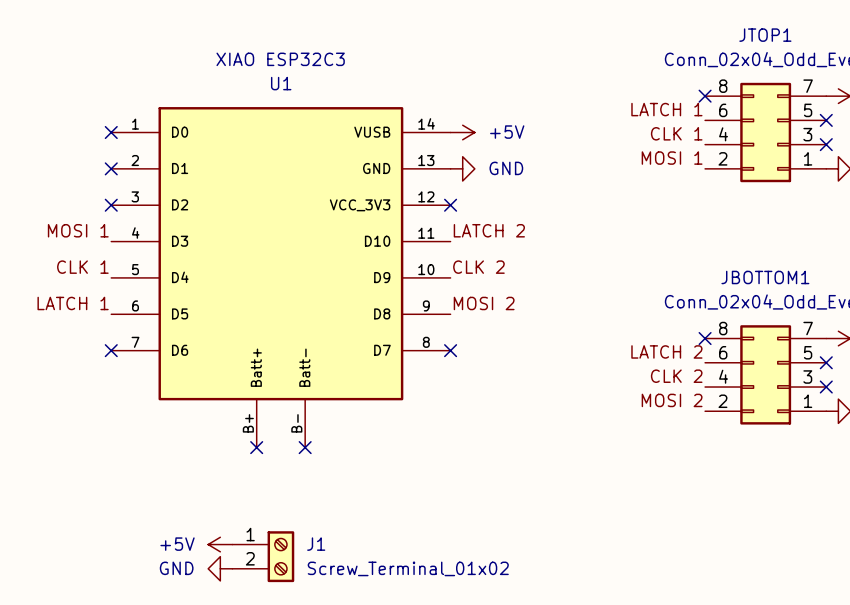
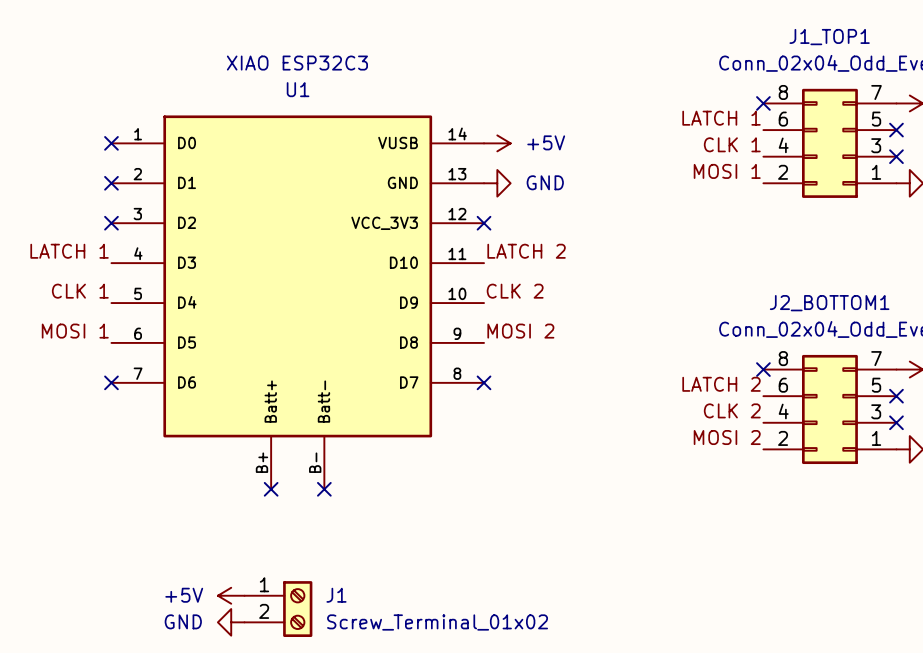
JTOP1 name: JTOP1 (765, 35) -> J1_TOP1 (829, 37)
label: MOSI 1 (78, 230) -> LATCH 1 (69, 251)
JBOTTOM1 name: JBOTTOM1 (765, 277) -> J2_BOTTOM1 (829, 303)
label: LATCH 1 (73, 303) -> MOSI 1 (75, 331)

